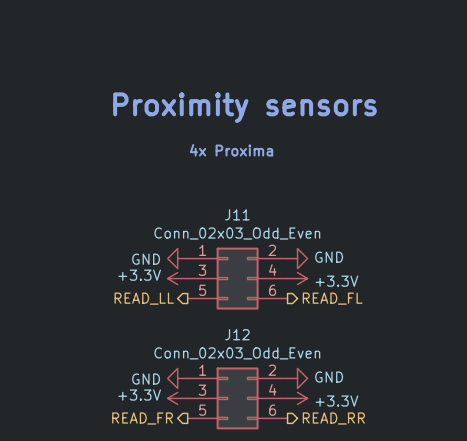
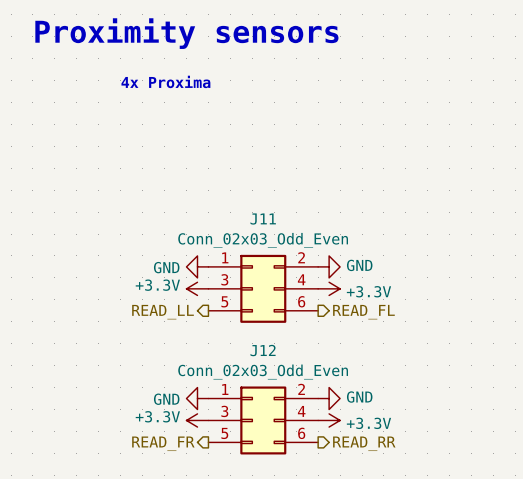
text position: Proximity sensors (244, 107) -> Proximity sensors (186, 33)
text position: 4x Proxima (231, 150) -> 4x Proxima (165, 81)

